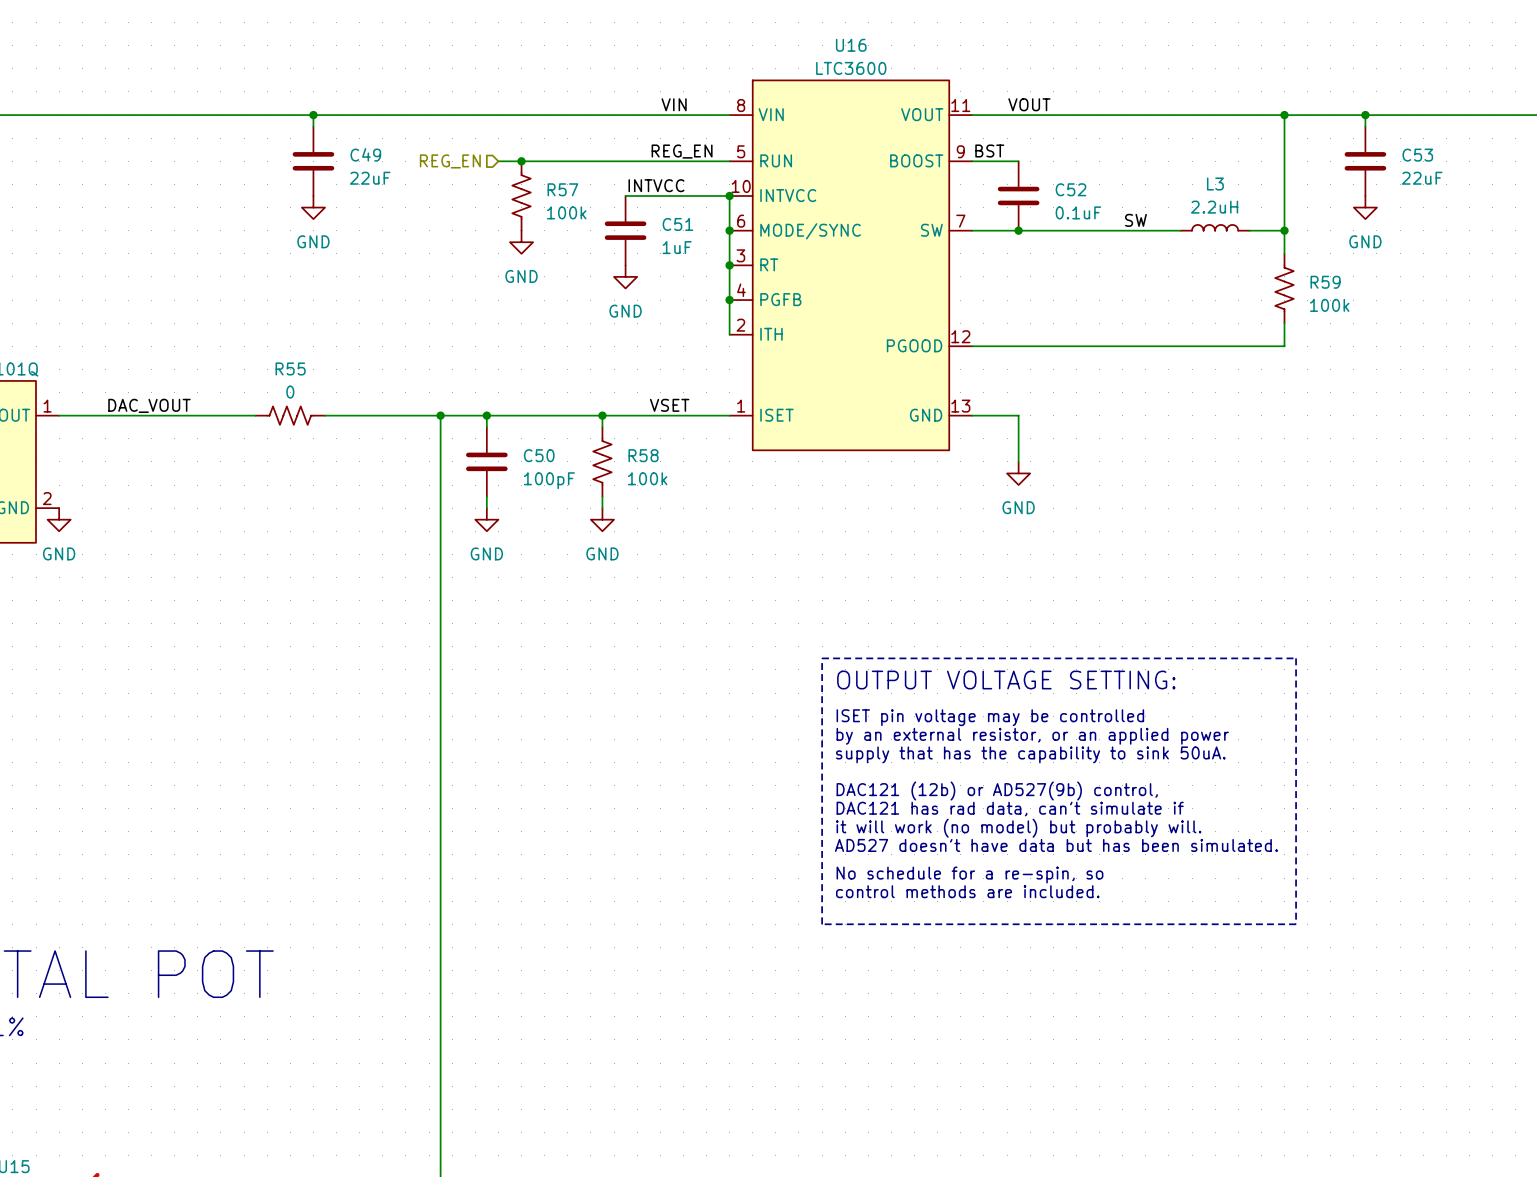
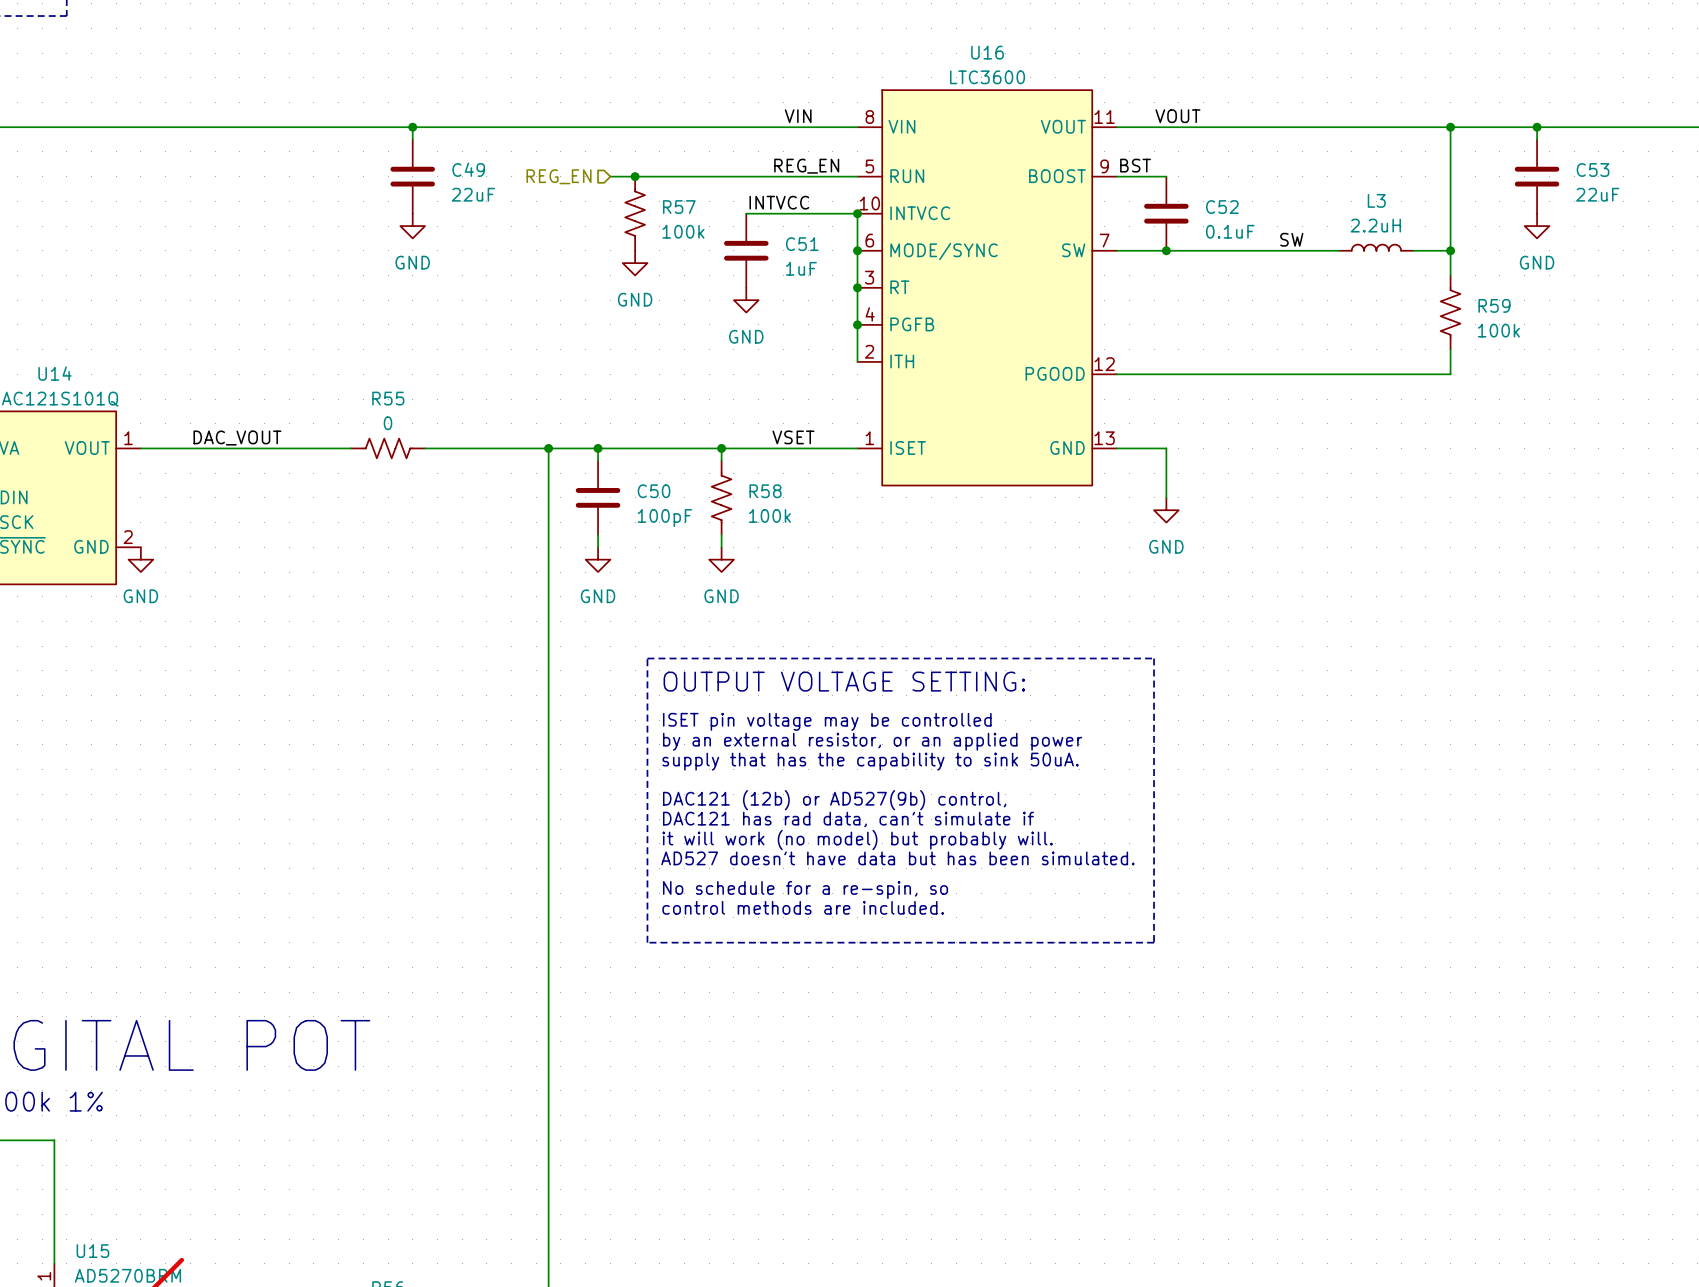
line: none -> (647, 658) (1154, 658) (1154, 942) (647, 942) (647, 658)
text: none -> OUTPUT VOLTAGE SETTING: (844, 681)
line: (822, 658) (1296, 658) (1296, 924) (822, 924) (822, 658) -> none
text: none -> ISET pin voltage may be controlled (827, 721)
text: OUTPUT VOLTAGE SETTING: (1006, 680) -> none
text: none -> by an external resistor, or an applied power (872, 741)
text: none -> supply that has the capability to sink 50uA. (870, 761)
text: ISET pin voltage may be controlled (990, 717) -> none
text: by an external resistor, or an applied power (1032, 736) -> none
text: none -> DAC121 (12b) or AD527(9b) control, (834, 800)
text: supply that has the capability to sink 50uA. (1030, 754) -> none
text: none -> DAC121 has rad data, can't simulate if (848, 819)
text: none -> it will work (no model) but probably will. (857, 839)
text: DAC121 (12b) or AD527(9b) control, (997, 790) -> none
text: none -> AD527 doesn't have data but has been simulated. (897, 858)
text: DAC121 has rad data, can't simulate if (1010, 809) -> none
text: none -> No schedule for a re-spin, so (805, 890)
text: it will work (no model) but probably will. (1018, 828) -> none
text: none -> control methods are included. (803, 907)
text: AD527 doesn't have data but has been simulated. (1056, 845) -> none
text: No schedule for a re-spin, so (969, 875) -> none
text: control methods are included. (967, 891) -> none

